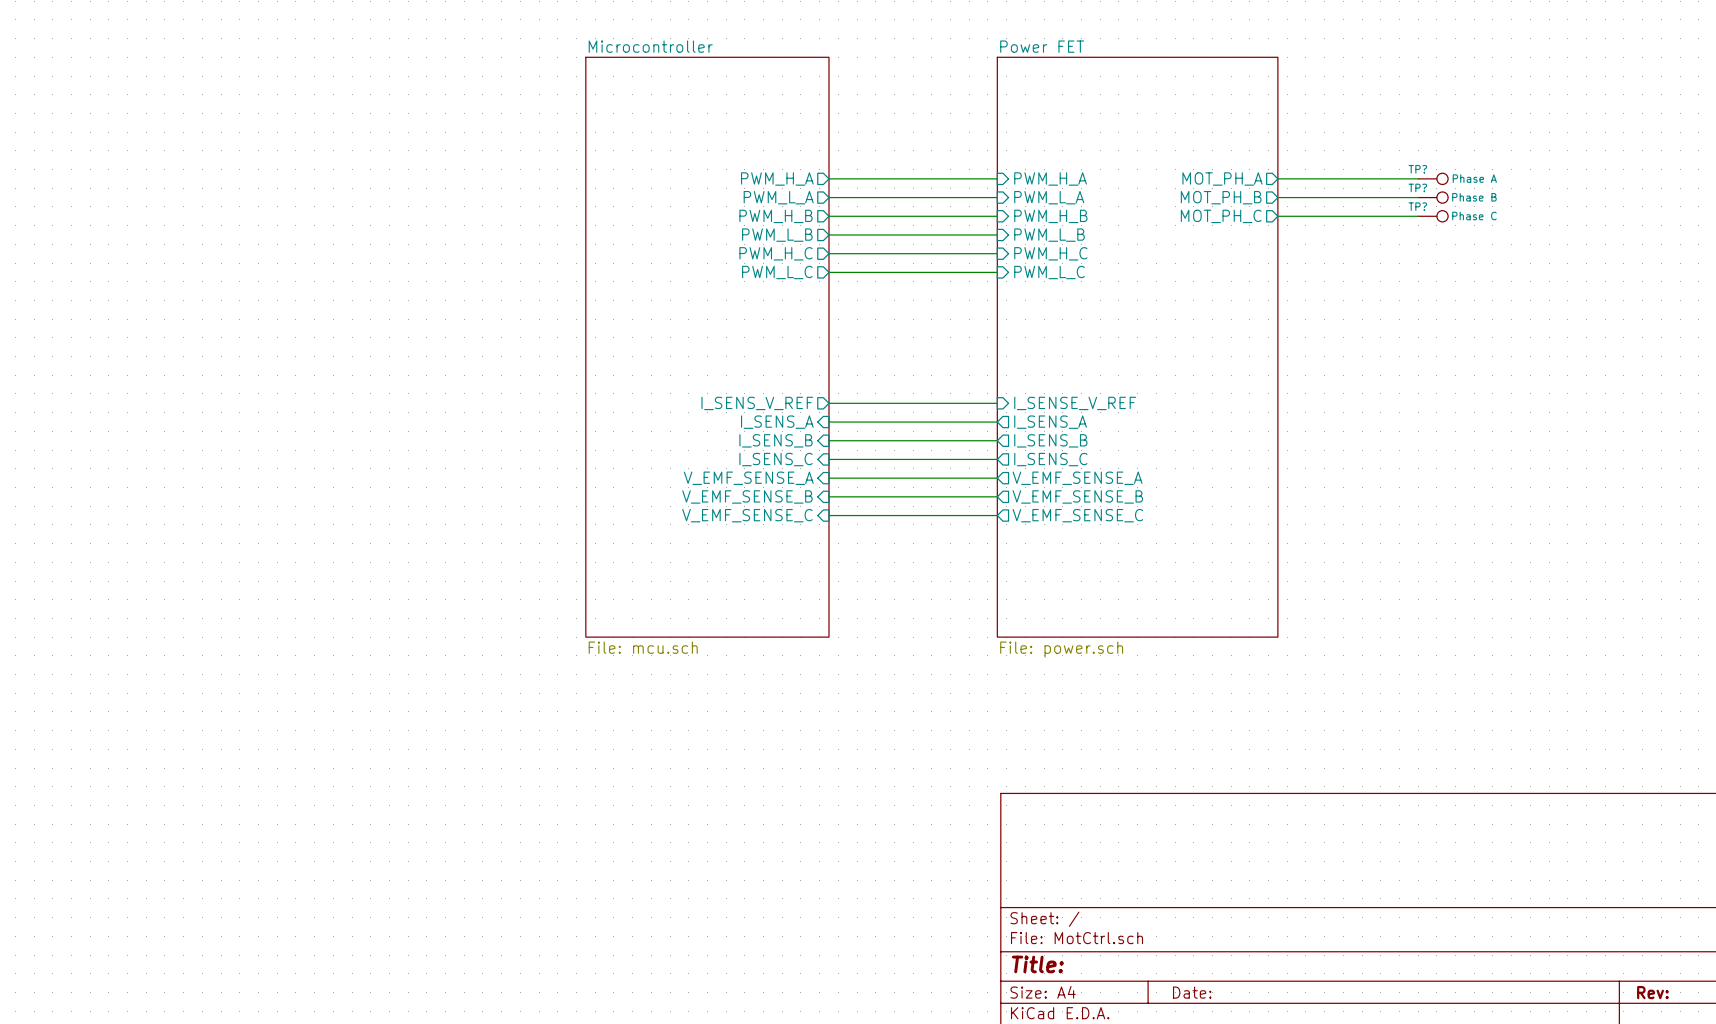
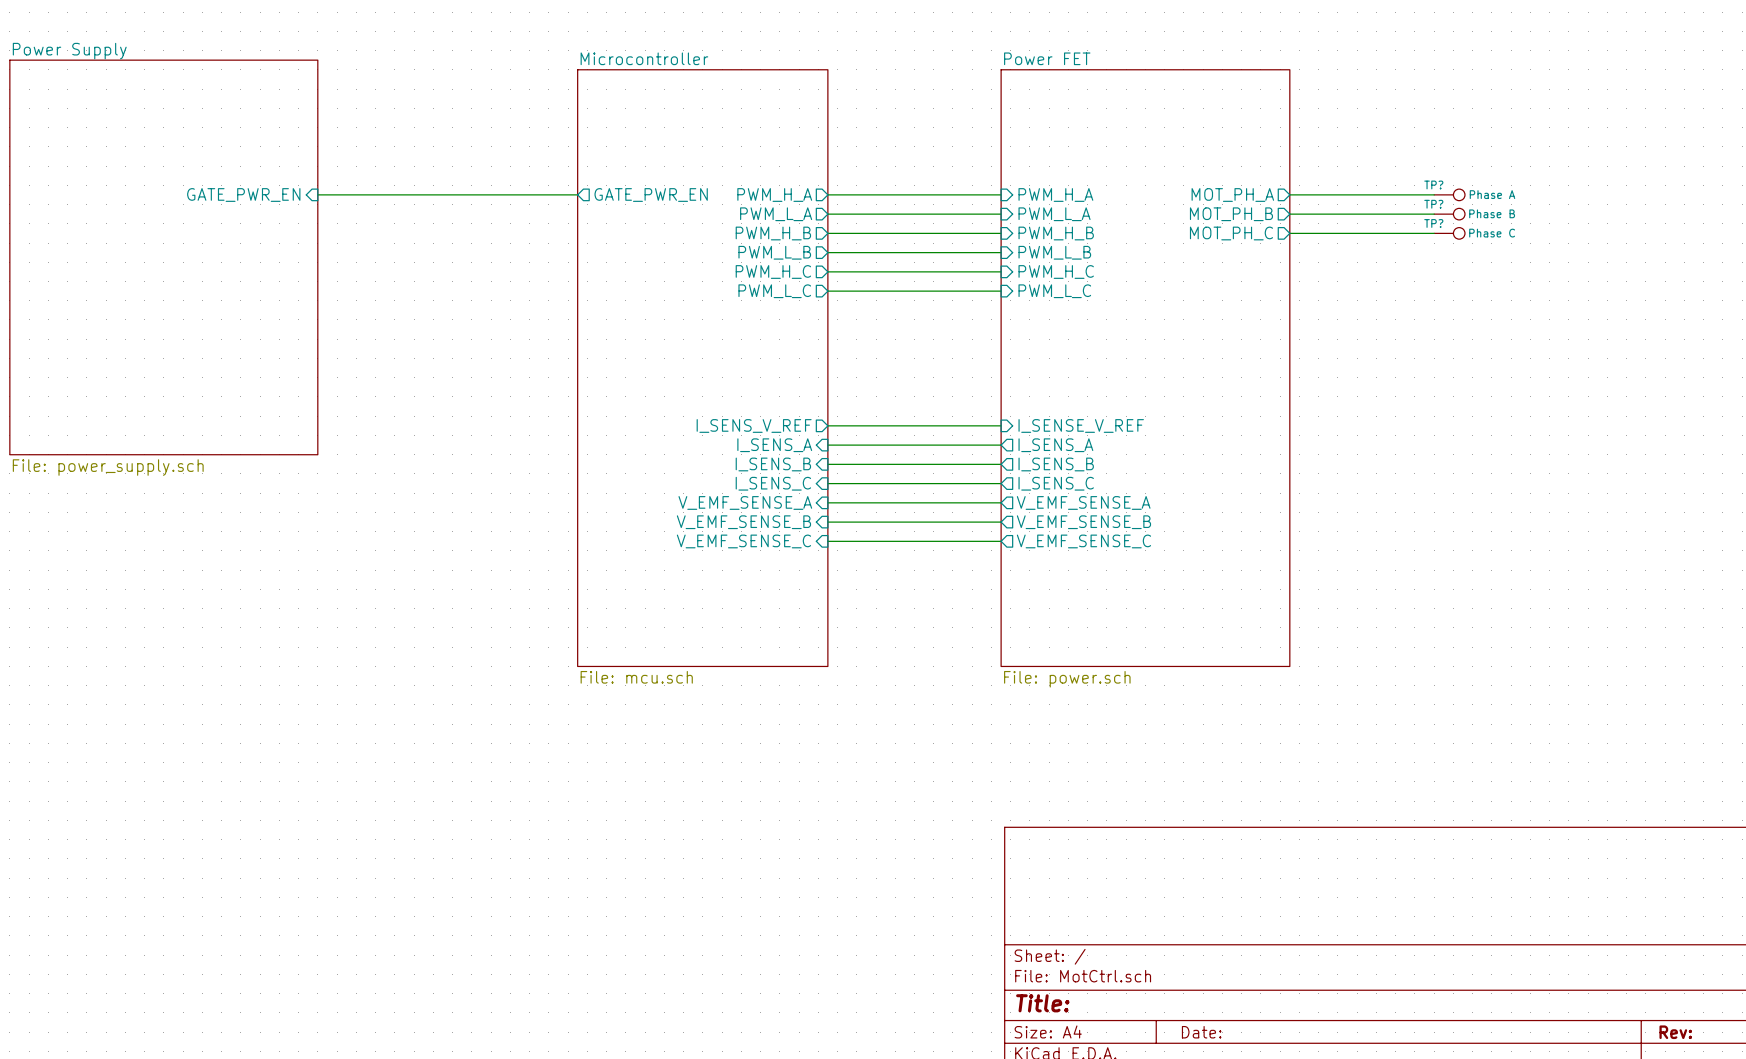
sheet pin: none -> GATE_PWR_EN (243, 195)
wire: none -> (317, 194) (577, 194)
sheet pin: none -> GATE_PWR_EN (651, 195)
sheet Power Supply: none -> File: power_supply.sch (163, 257)

